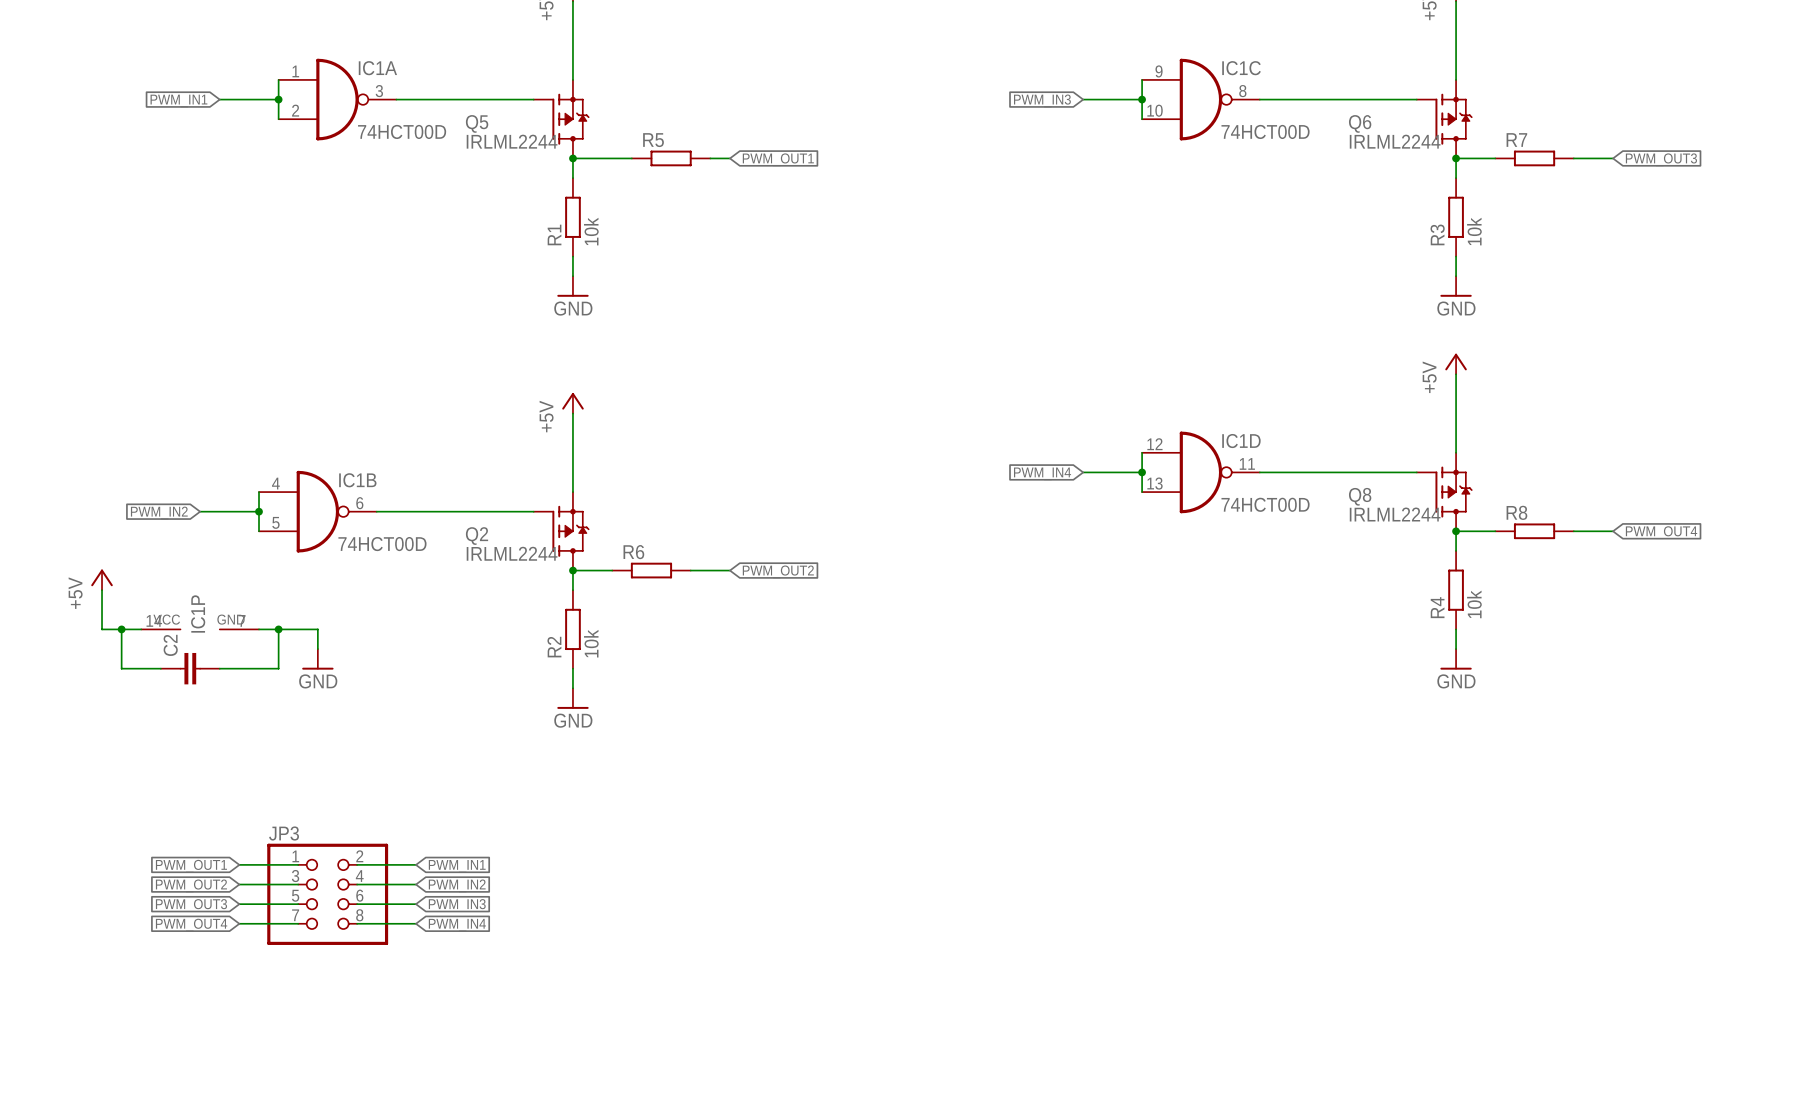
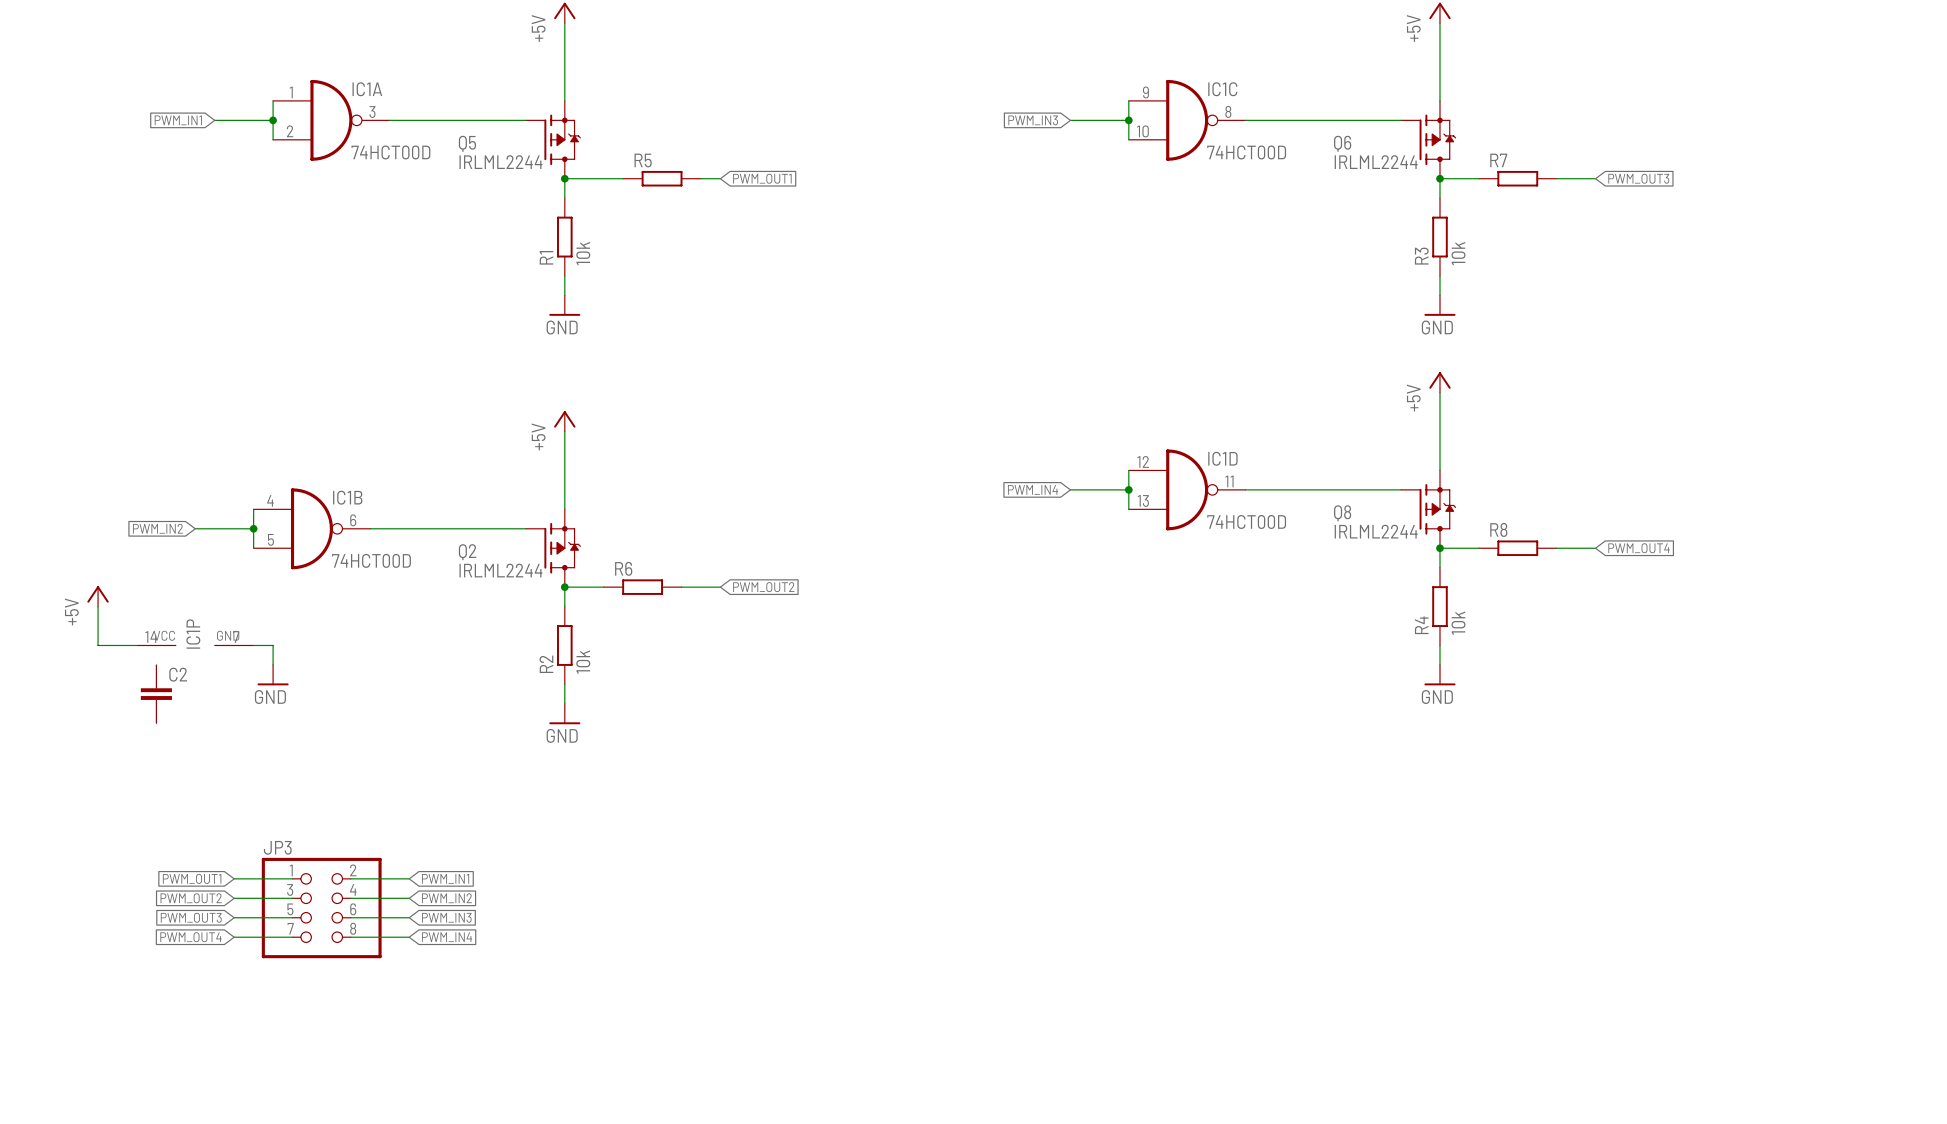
wire: (121, 629) (121, 668) (160, 668) -> none
junction: (121, 629) -> none
wire: (278, 629) (317, 629) (317, 649) -> none
junction: (278, 629) -> none
wire: (278, 649) (278, 668) (219, 668) -> none
power symbol position: GND (317, 659) -> GND (273, 675)
C2 rotation: 0° (190, 668) -> 90° clockwise (156, 694)

